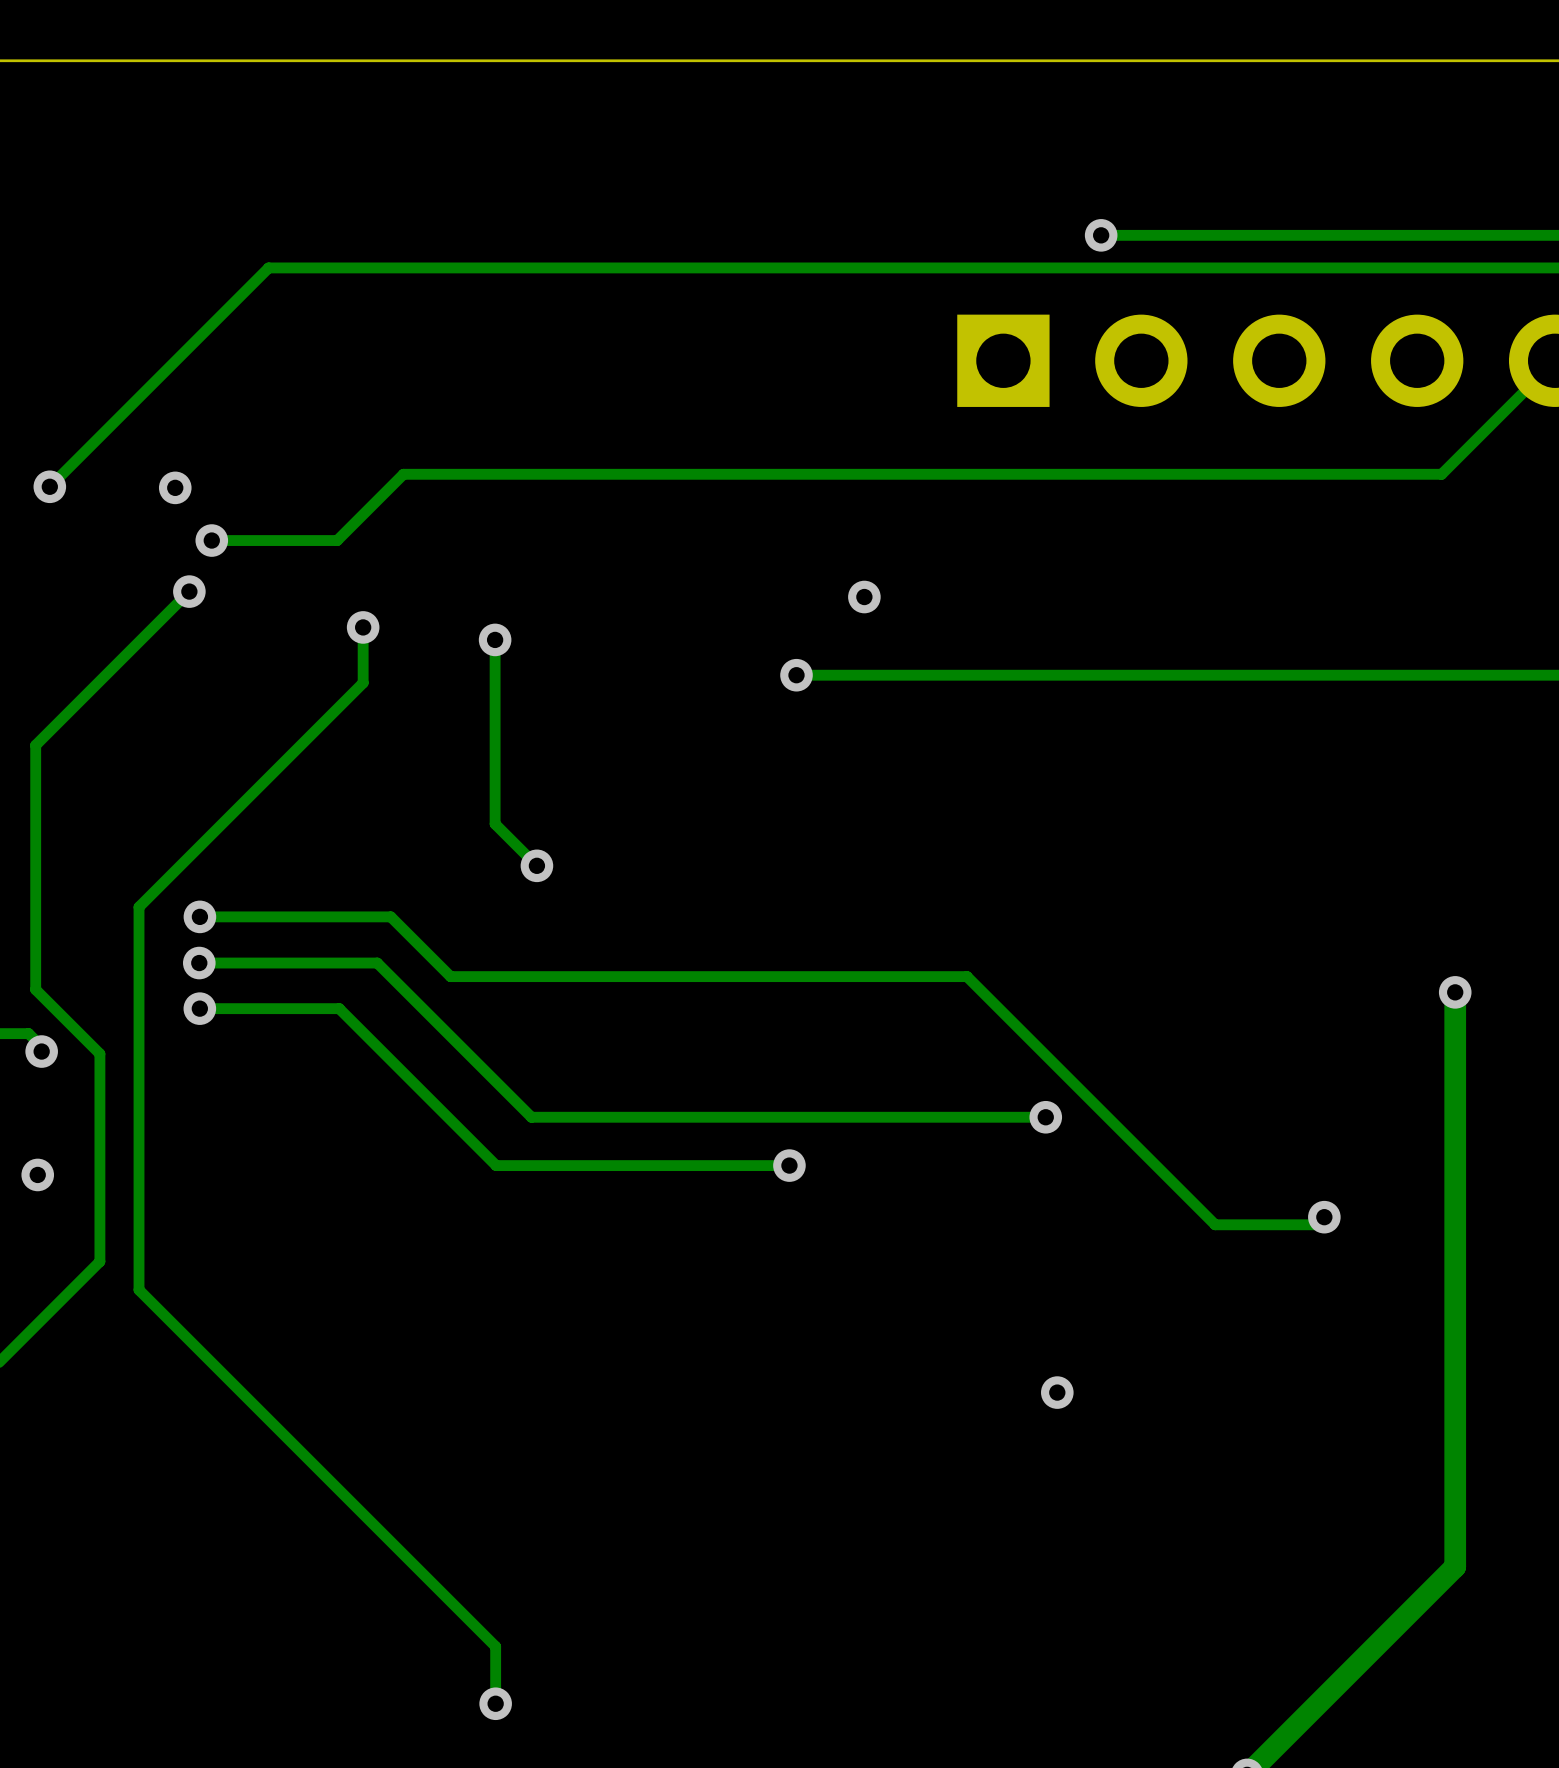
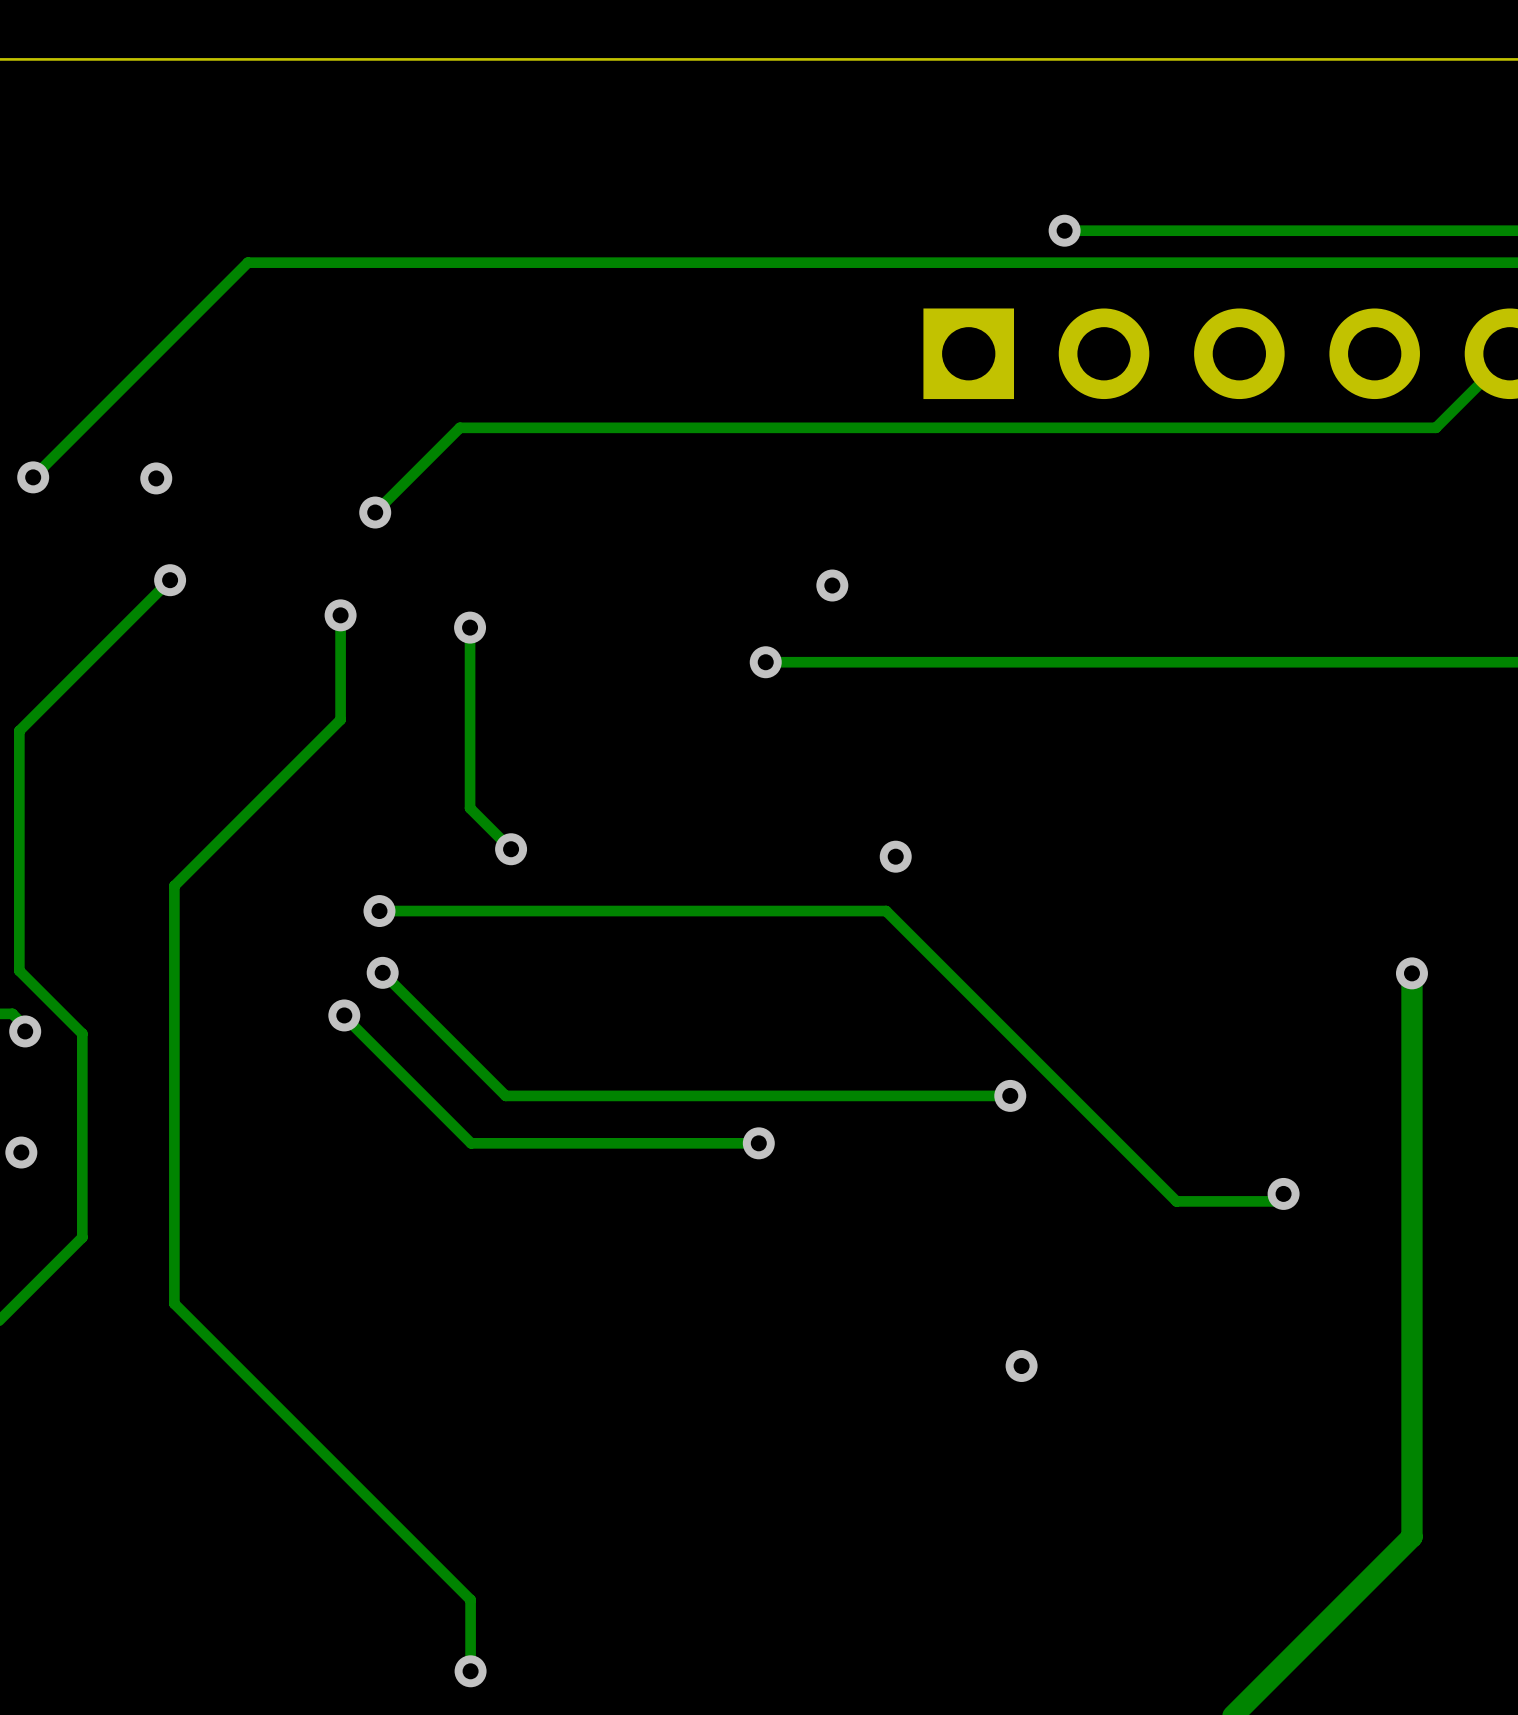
track: (1479, 436) (1441, 474) (403, 474) (337, 540) (211, 540) -> (1435, 427) (459, 427) (375, 512)
via position: (211, 540) -> (375, 512)
track: (363, 682) (139, 907) (139, 1289) (495, 1646) -> (340, 669) (340, 719) (174, 885) (174, 1303) (470, 1599) (470, 1615)
via: none -> (895, 856)
track: (199, 916) (390, 916) (450, 976) (967, 976) -> (379, 911) (886, 911) (933, 957)
via: (199, 916) -> none
via: none -> (379, 911)
track: (199, 963) (377, 963) (406, 991) -> none
via: (199, 963) -> none
via: none -> (382, 972)
track: (199, 1008) (339, 1008) (366, 1036) -> none
via: (199, 1008) -> none
via: none -> (344, 1015)

